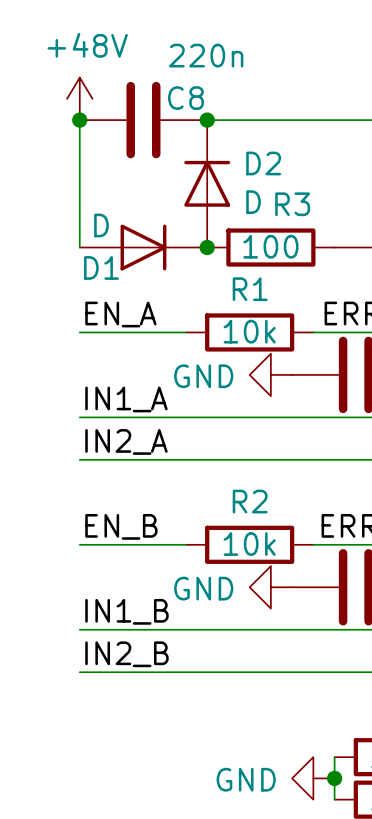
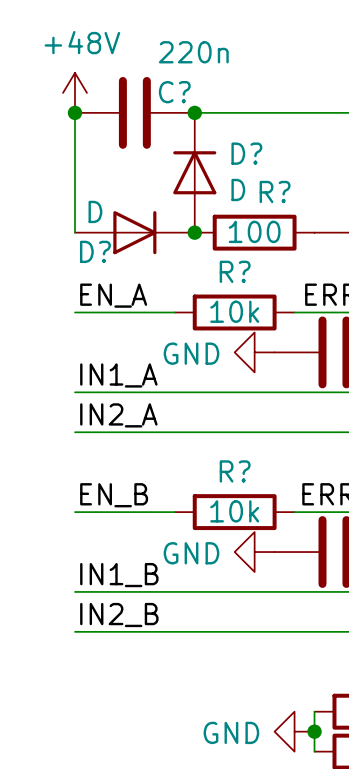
C8 name: C8 (185, 98) -> C? (174, 92)
D2 name: D2 (263, 163) -> D? (246, 153)
R3 name: R3 (292, 204) -> R? (275, 191)
D1 name: D1 (101, 267) -> D? (95, 251)
R1 name: R1 (250, 289) -> R? (235, 271)
R2 name: R2 (250, 501) -> R? (235, 471)

